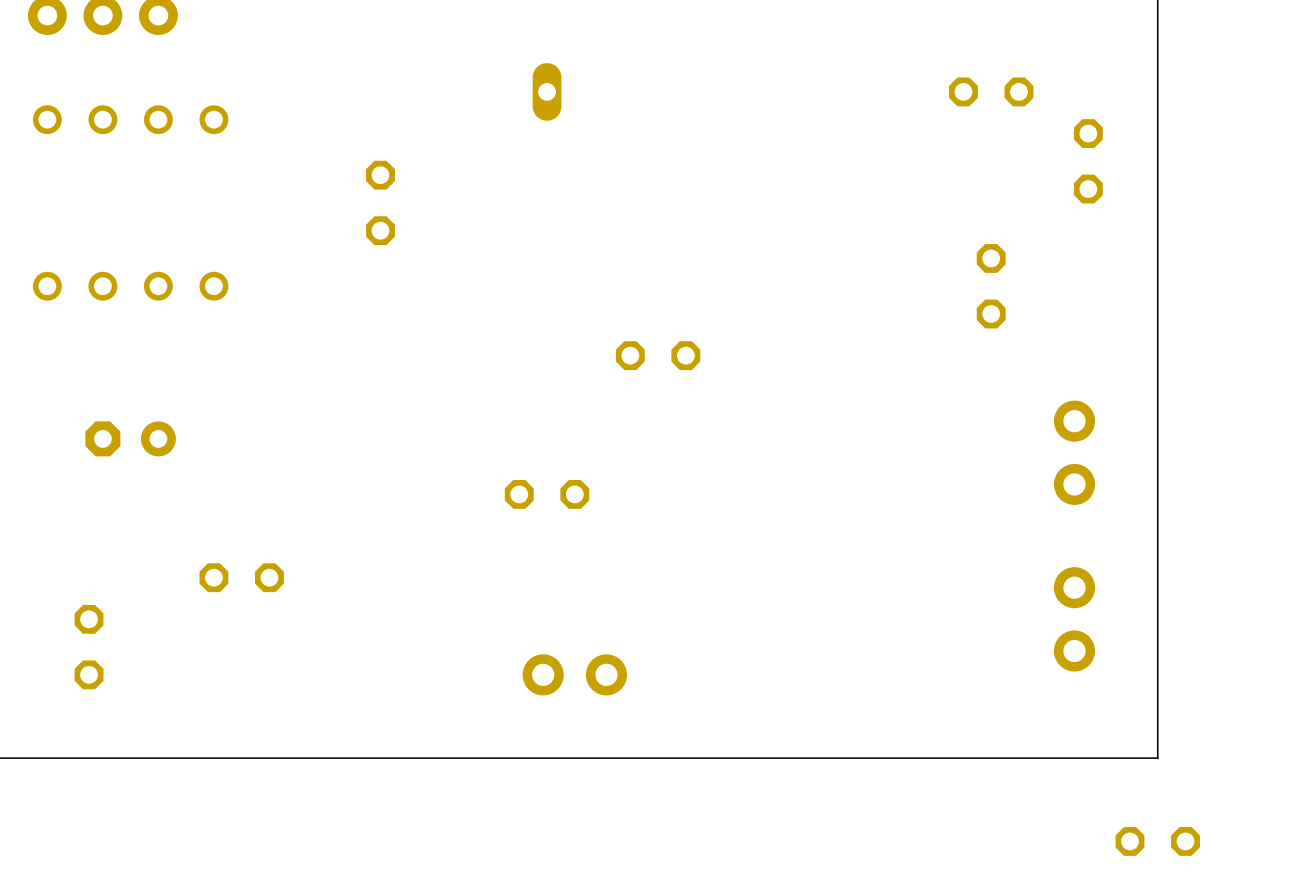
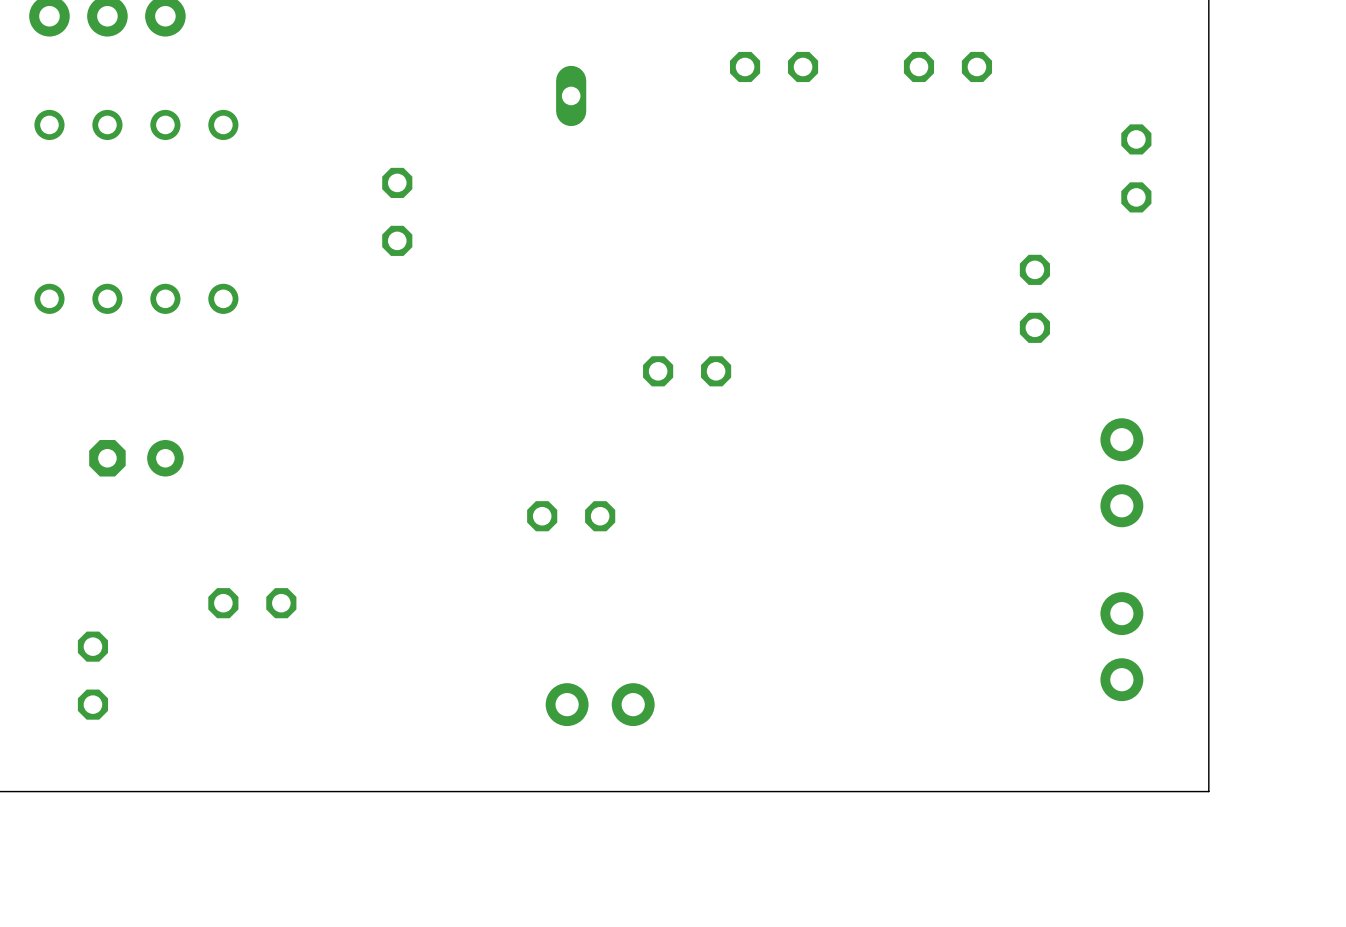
part: none -> (774, 66)
part position: (991, 91) -> (947, 66)
part: (1157, 841) -> none

